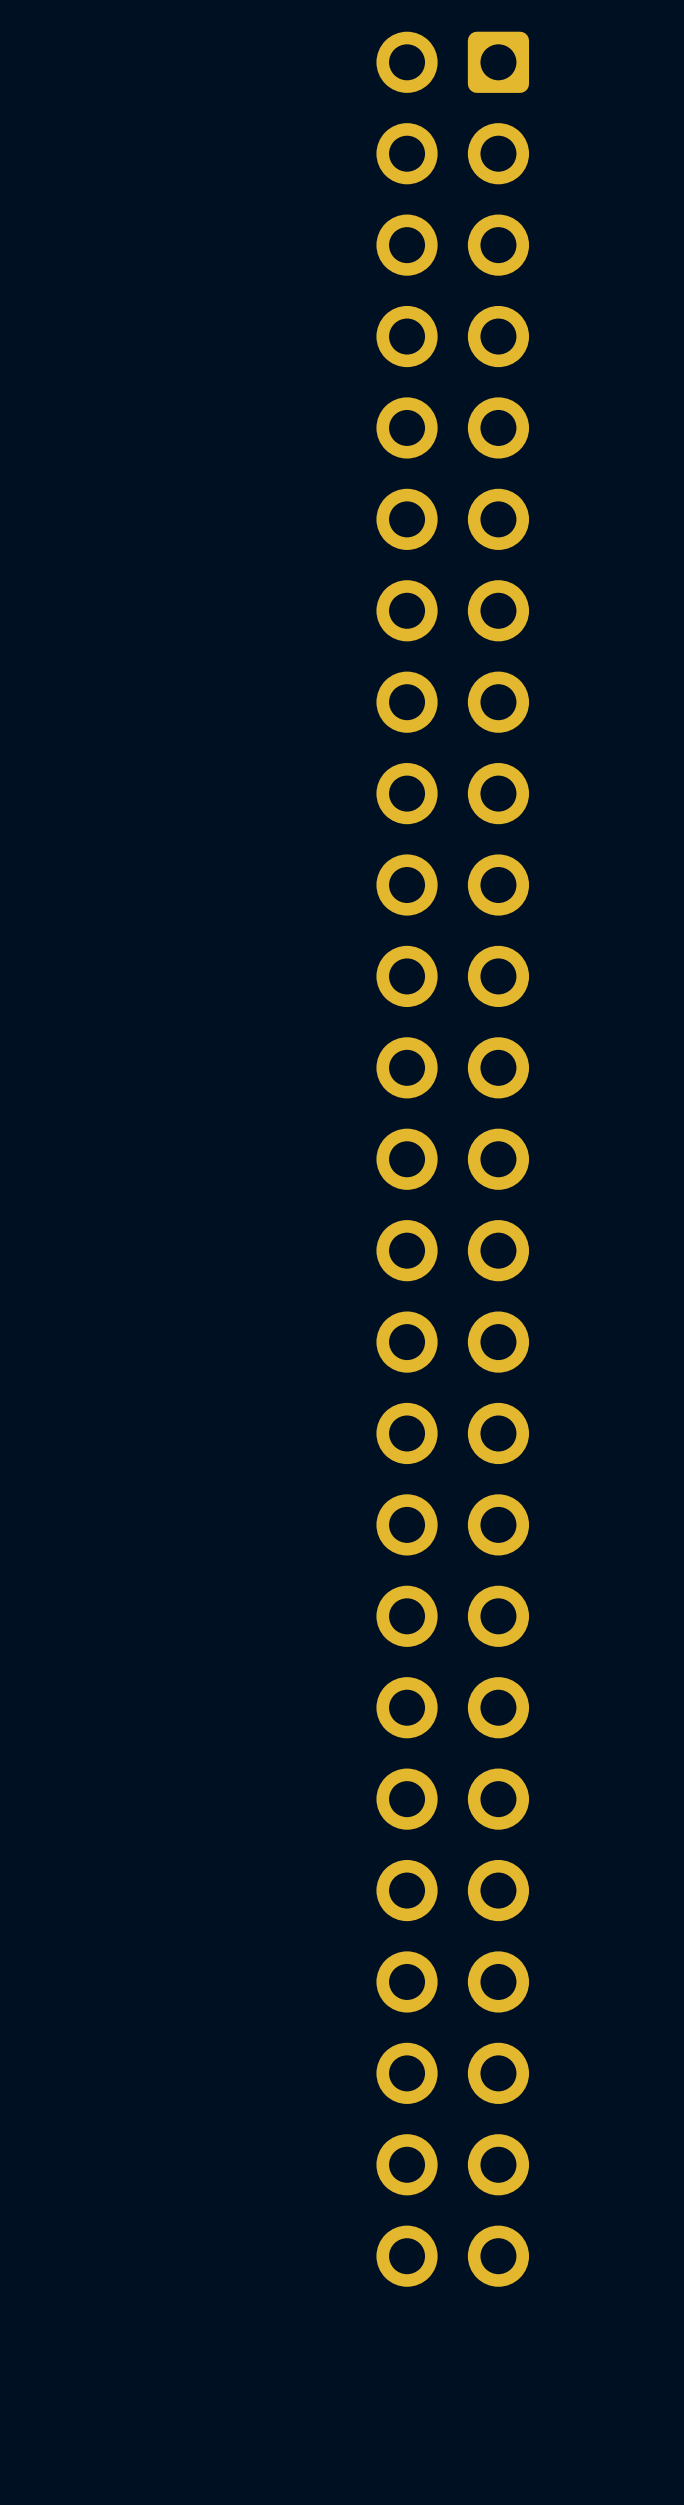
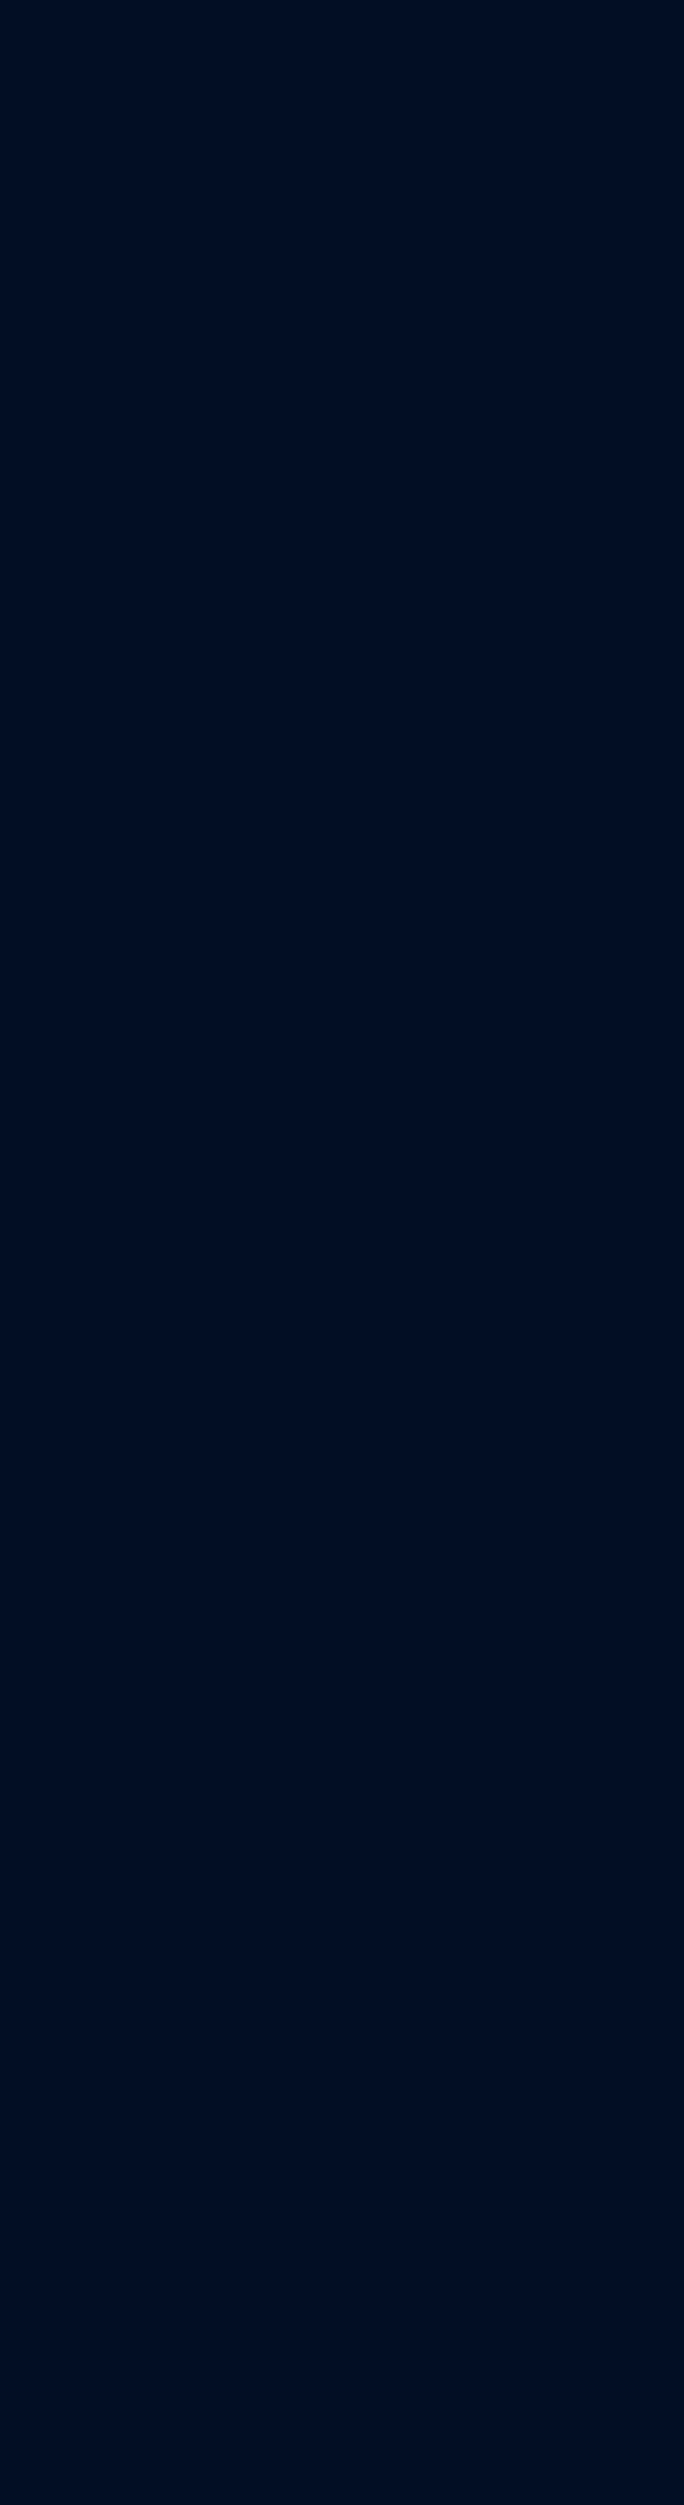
part: (452, 1159) -> none

